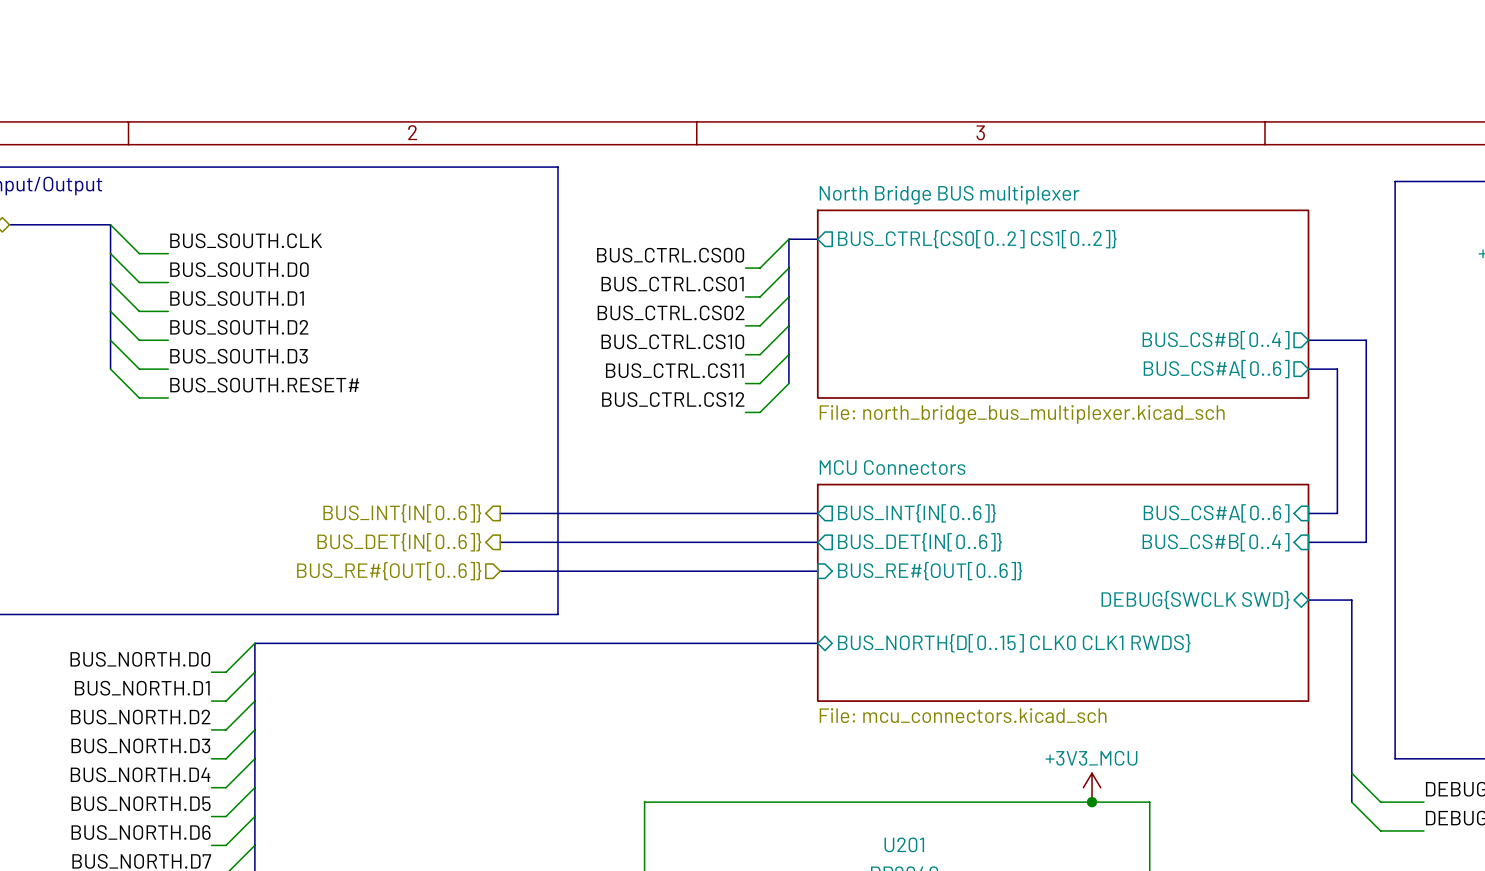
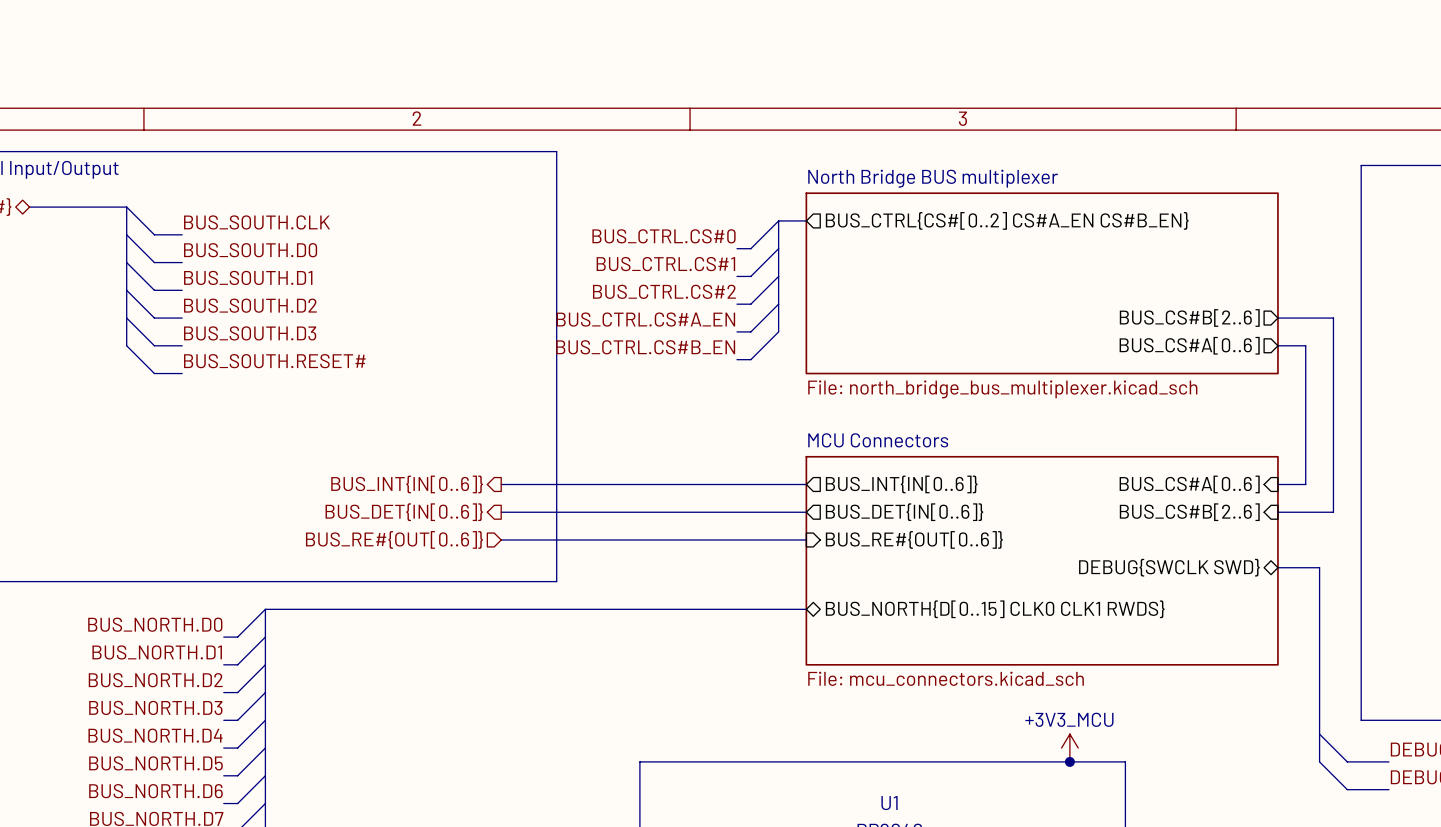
sheet pin: BUS_CTRL{CS0[0..2] CS1[0..2]} (977, 239) -> BUS_CTRL{CS#[0..2] CS#A_EN CS#B_EN} (1007, 220)
label: BUS_CTRL.CS00 (670, 255) -> BUS_CTRL.CS#0 (664, 236)
label: BUS_CTRL.CS01 (672, 284) -> BUS_CTRL.CS#1 (665, 264)
label: BUS_CTRL.CS02 (671, 312) -> BUS_CTRL.CS#2 (664, 291)
sheet pin: BUS_CS#B[0..4] (1216, 340) -> BUS_CS#B[2..6] (1189, 318)
label: BUS_CTRL.CS10 (672, 341) -> BUS_CTRL.CS#A_EN (645, 319)
bus: (788, 354) (788, 383) -> none
label: BUS_CTRL.CS11 (674, 370) -> BUS_CTRL.CS#B_EN (645, 347)
wire: (788, 383) (760, 412) (745, 412) -> none
label: BUS_CTRL.CS12 (673, 399) -> none
sheet pin: BUS_CS#B[0..4] (1216, 542) -> BUS_CS#B[2..6] (1189, 512)
U201 name: U201 (904, 844) -> U1 (889, 803)

